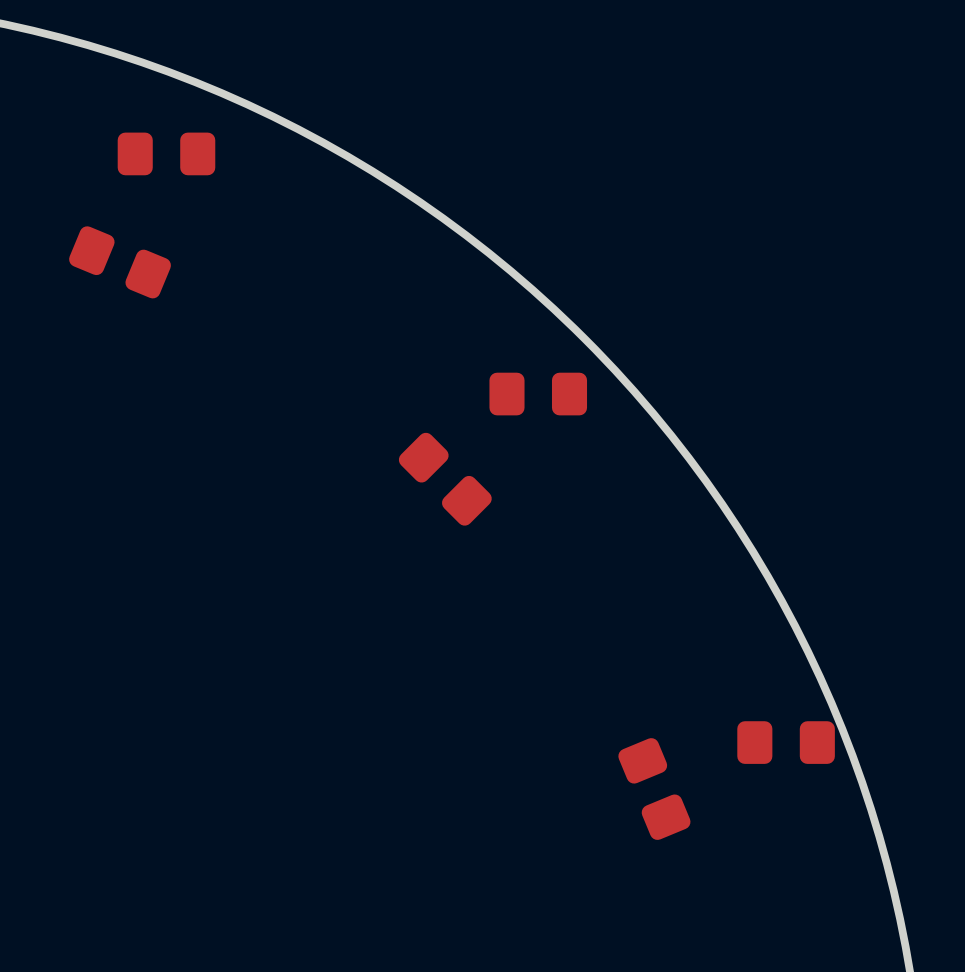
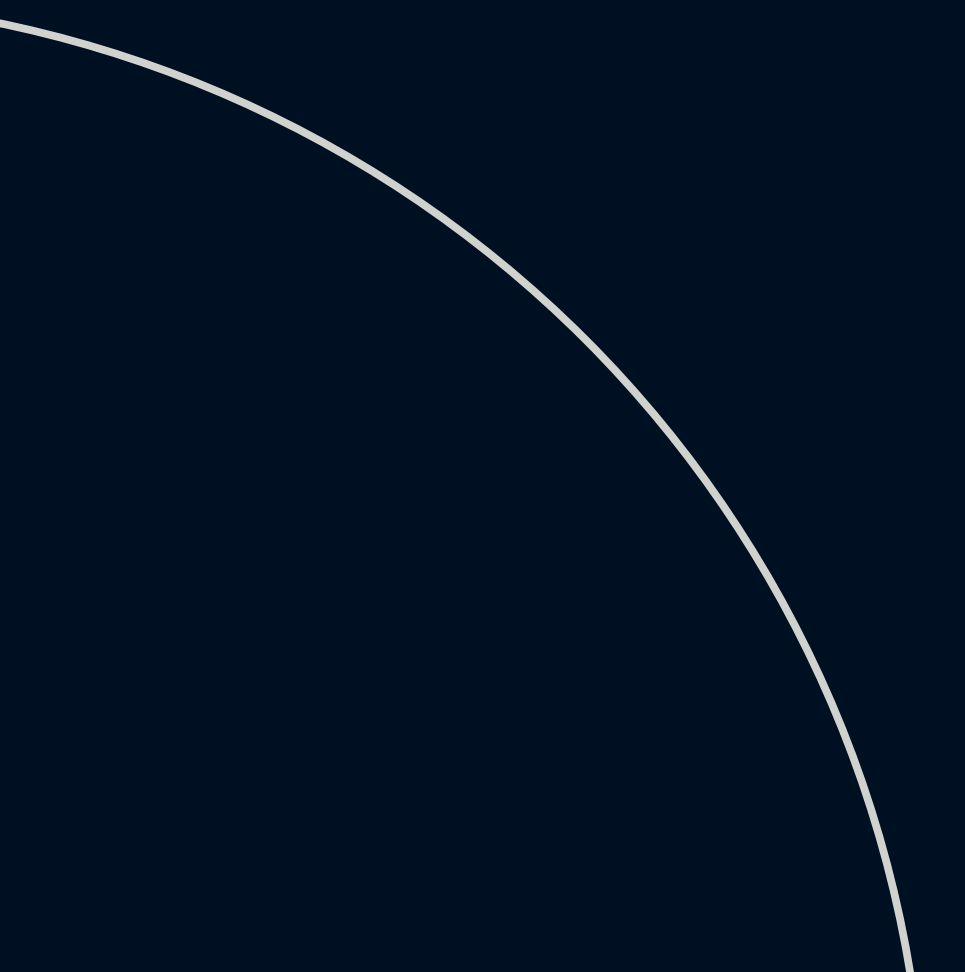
part: (166, 153) -> none
part: (120, 262) -> none
part: (538, 394) -> none
part: (445, 479) -> none
part: (786, 742) -> none
part: (654, 789) -> none

